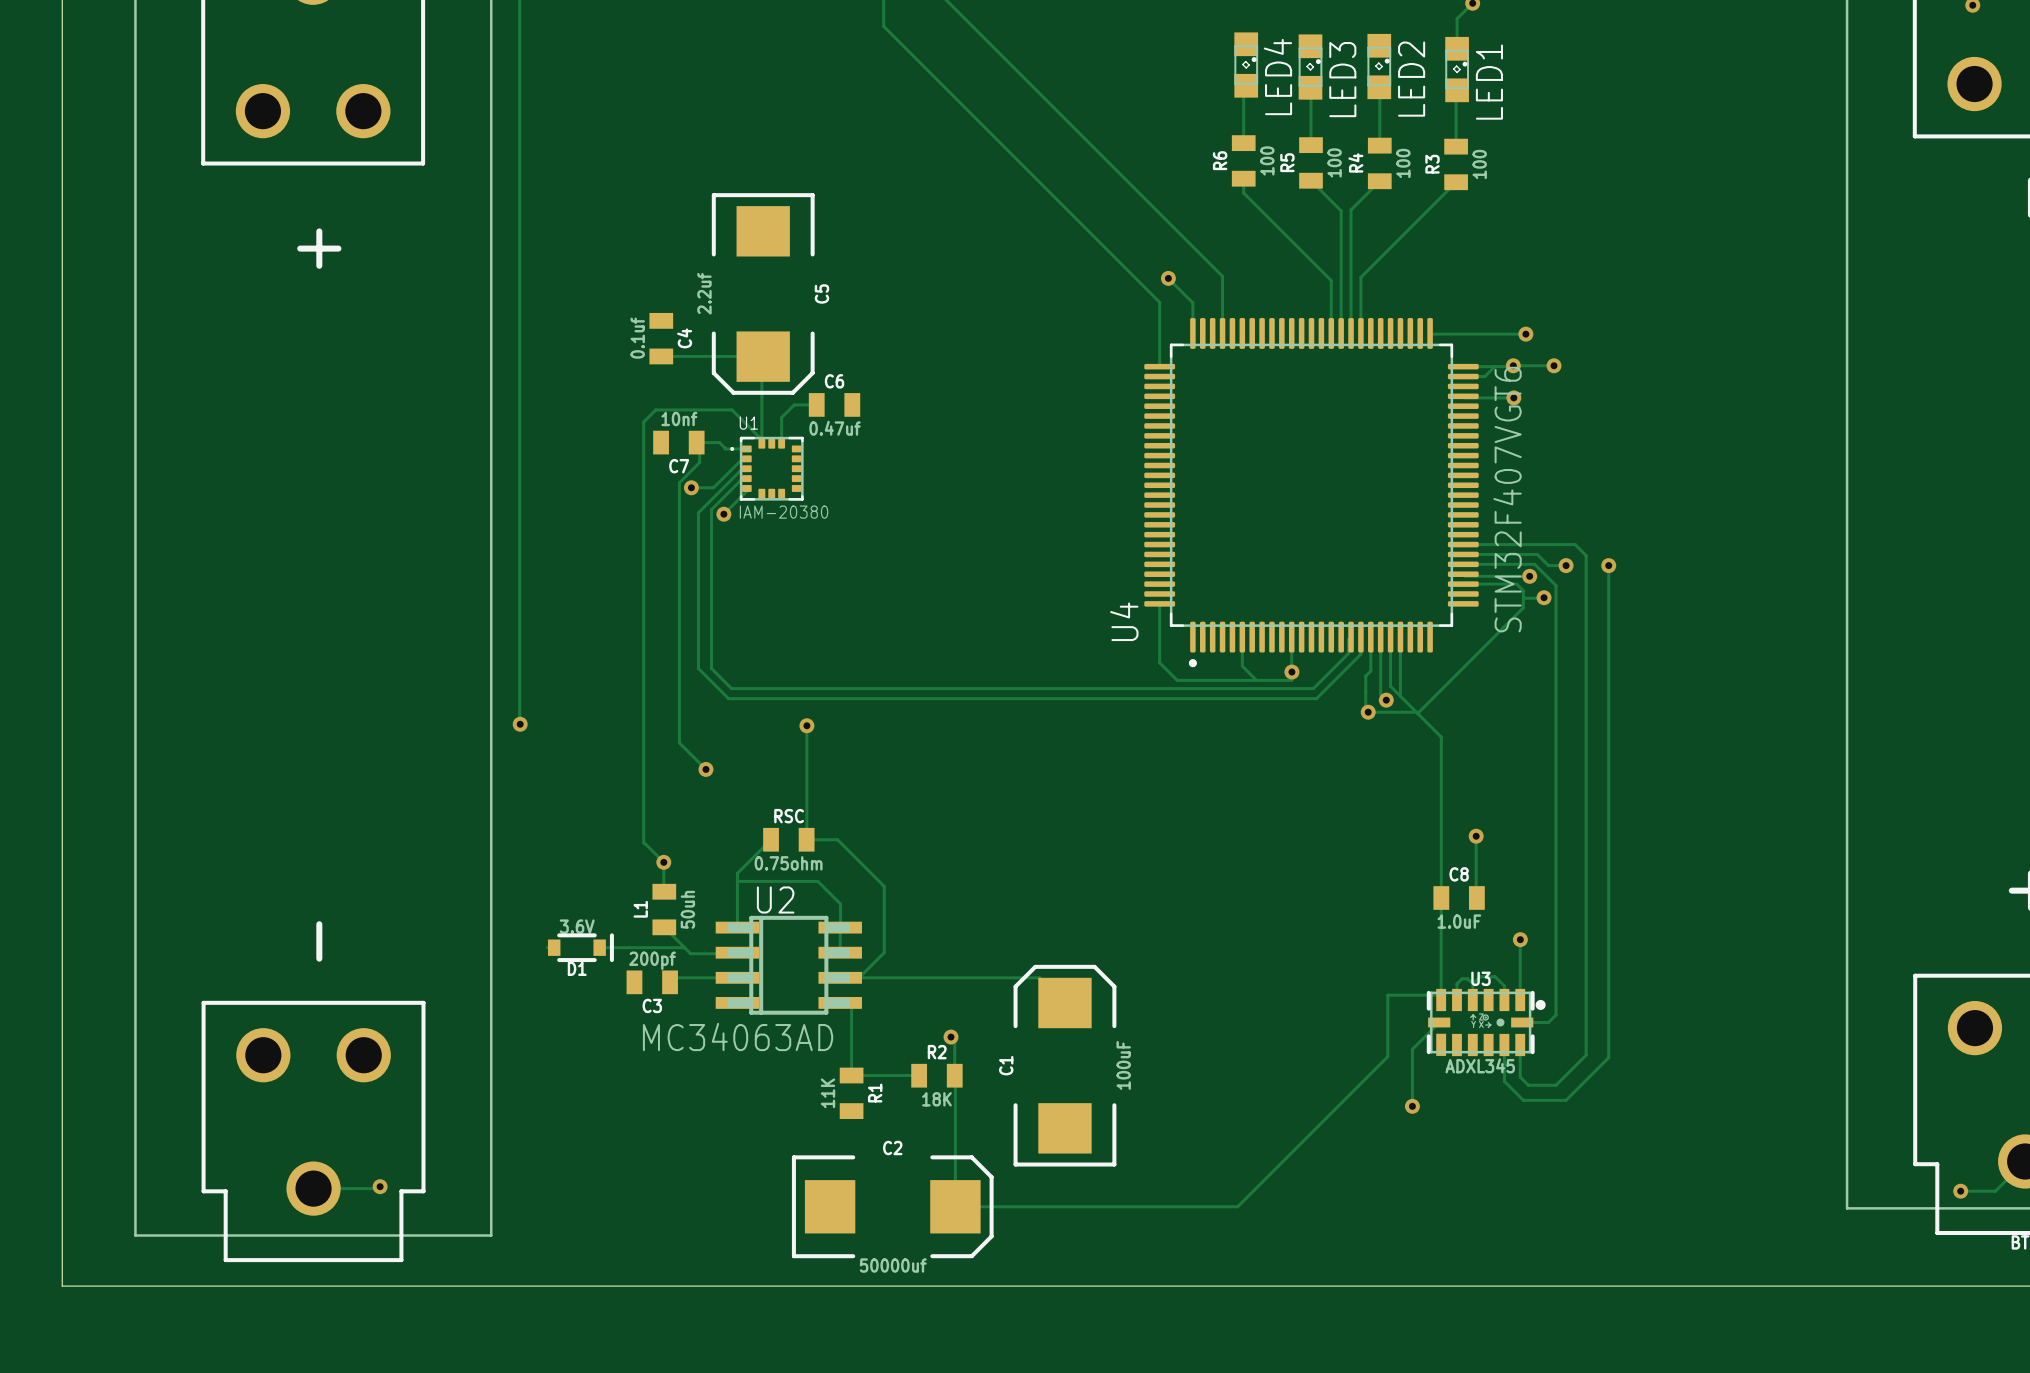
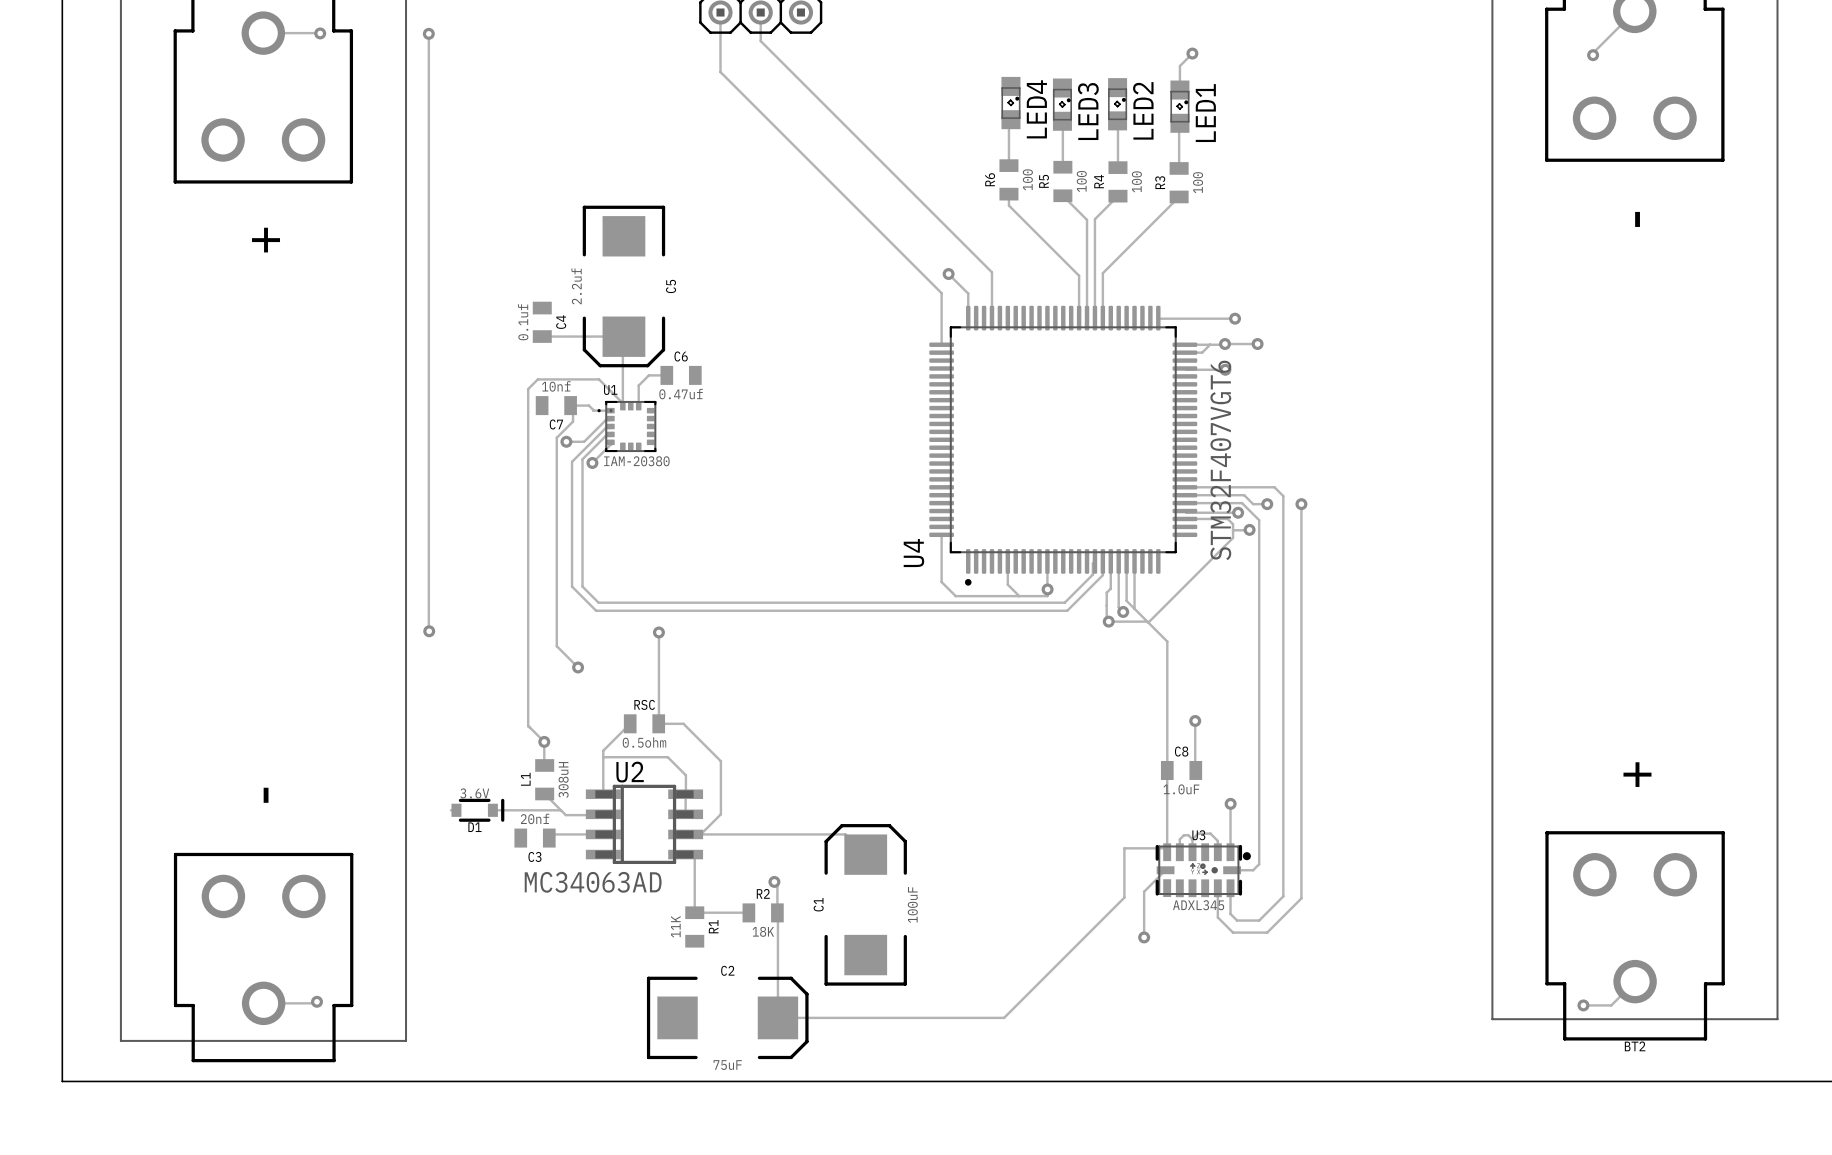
RSC value: 0.75ohm (788, 863) -> 0.5ohm (644, 742)
L1 value: 50uh (687, 909) -> 308uH (563, 779)
C3 value: 200pf (652, 960) -> 20nf (535, 818)
C2 value: 50000uf (893, 1265) -> 75uF (727, 1065)

